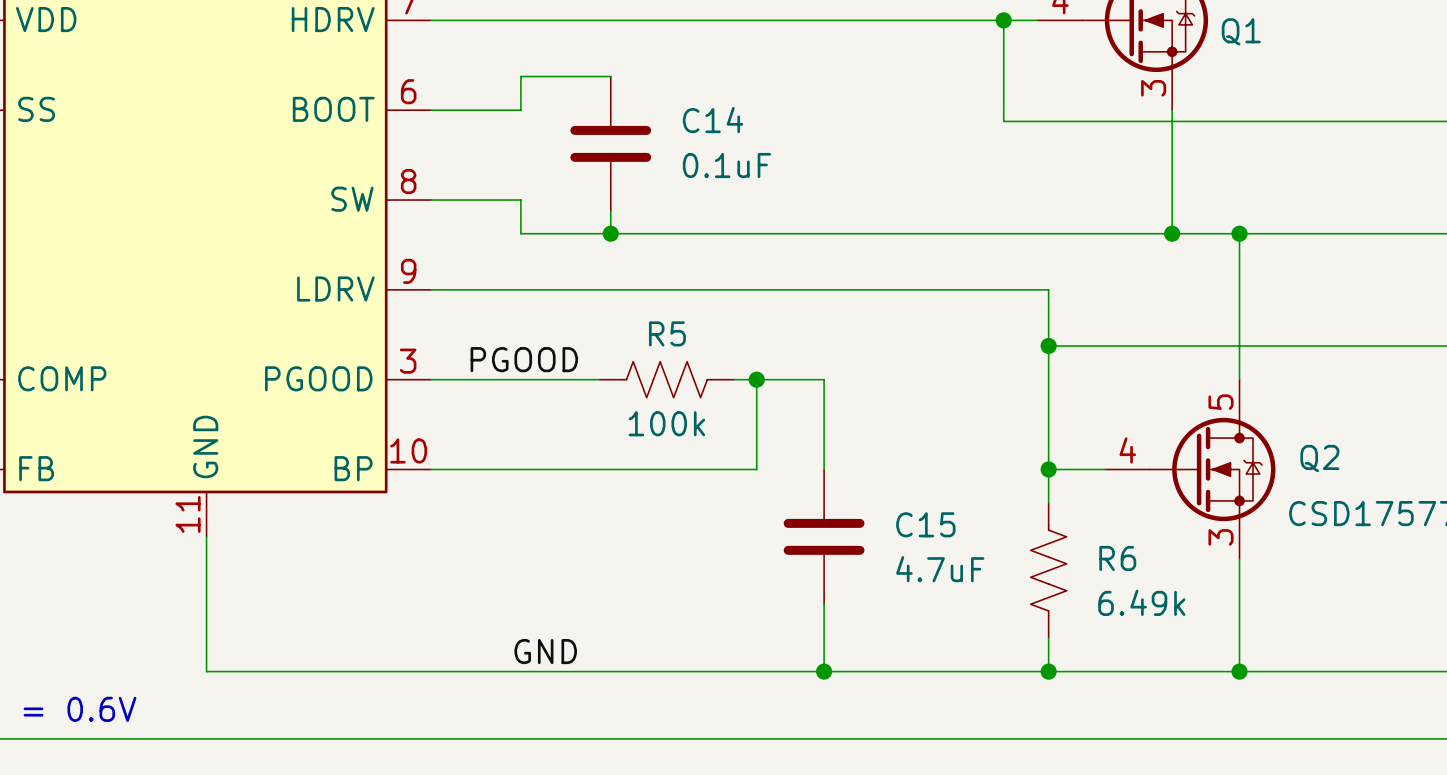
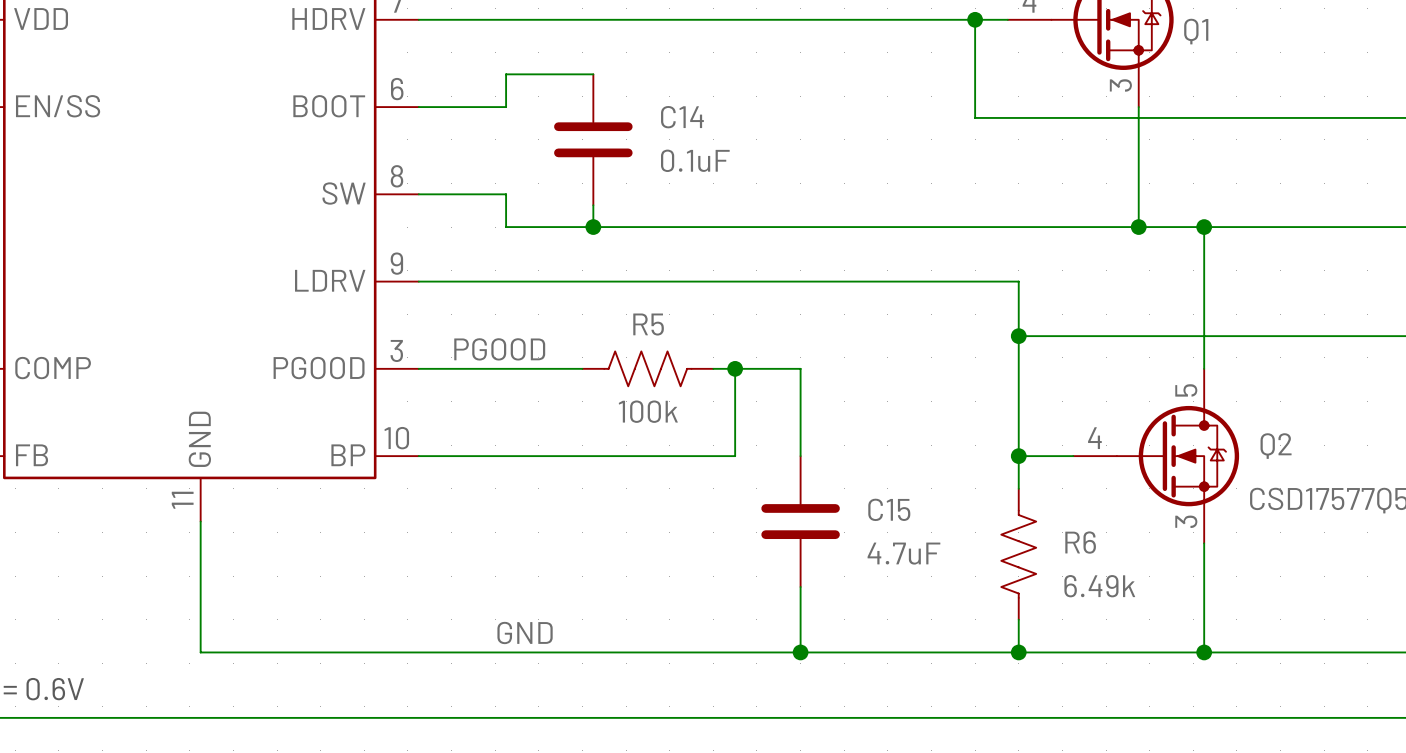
part pin name: SS (36, 109) -> EN/SS (58, 106)

